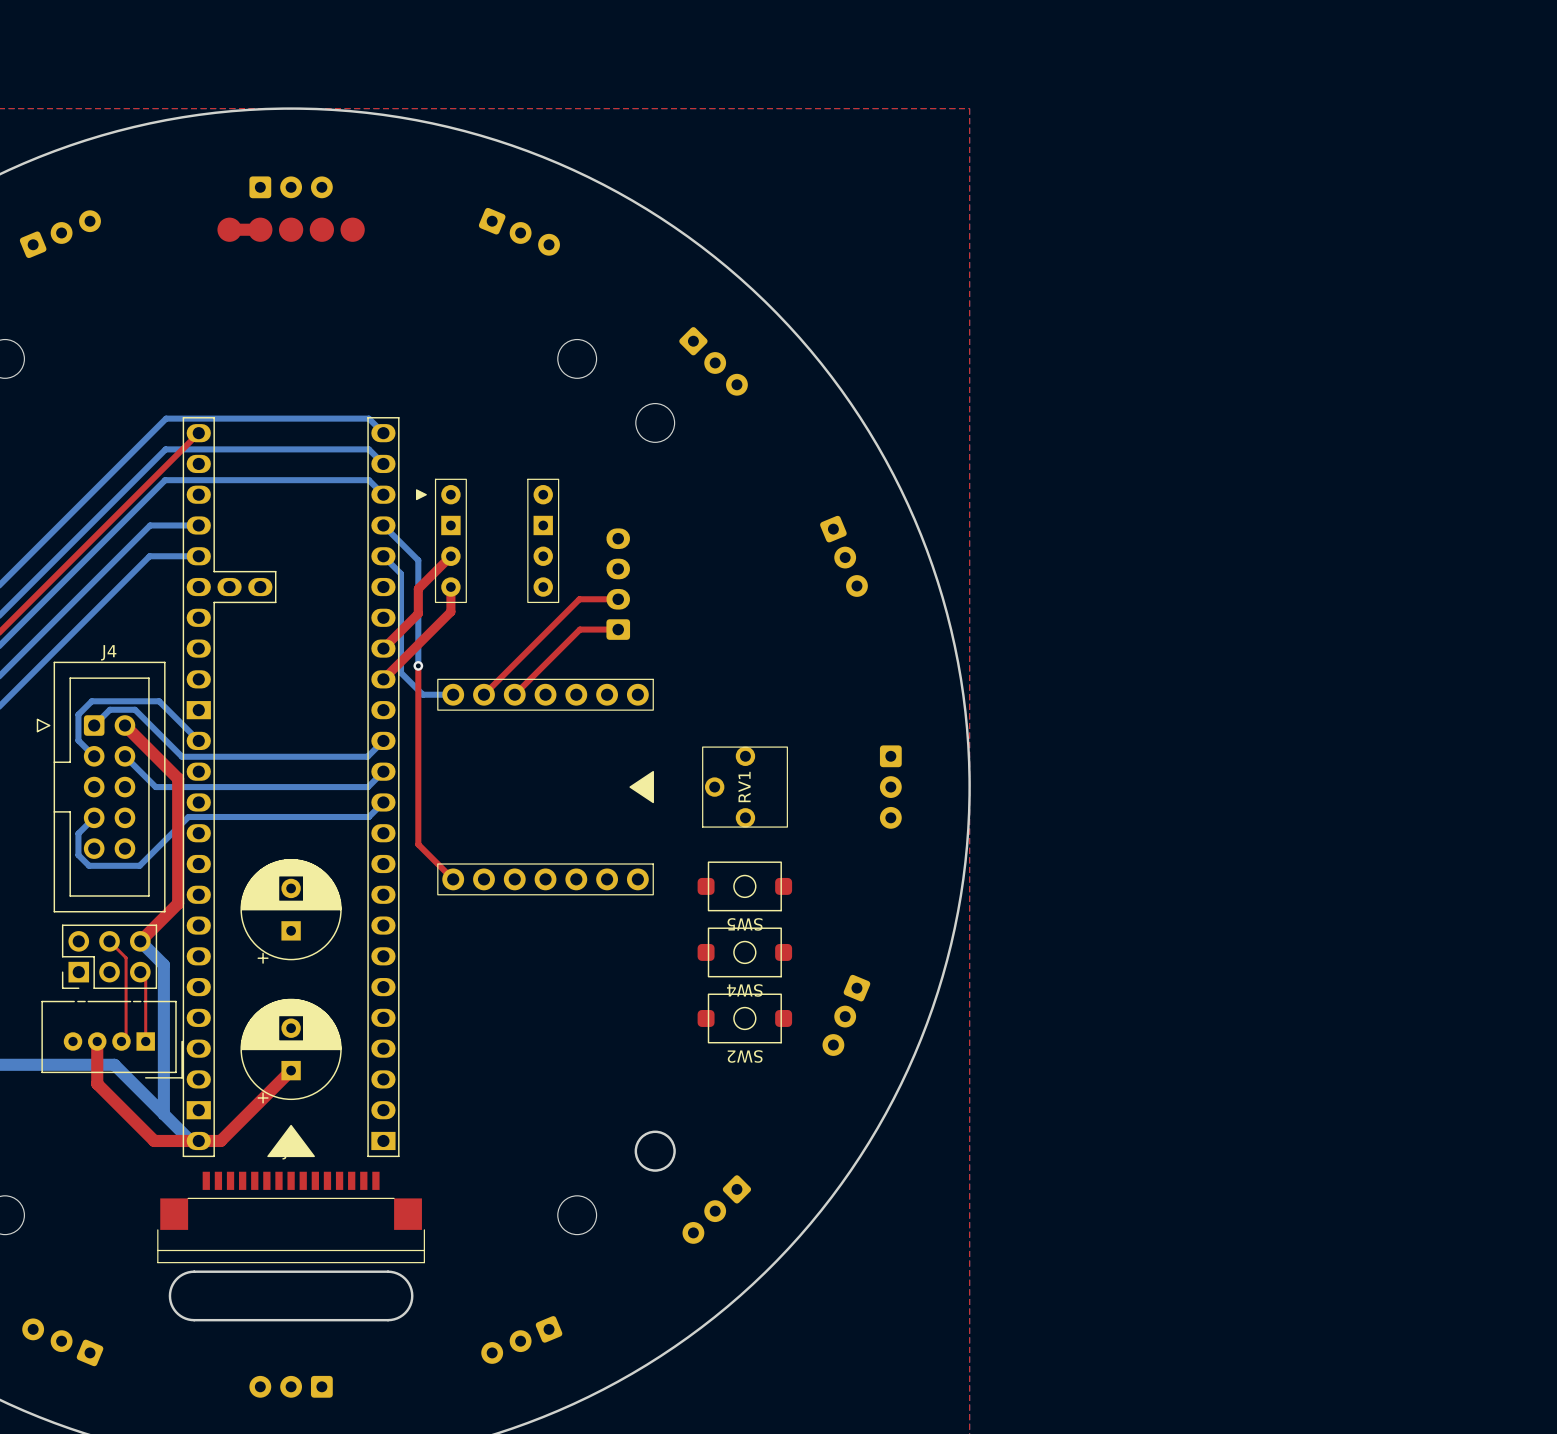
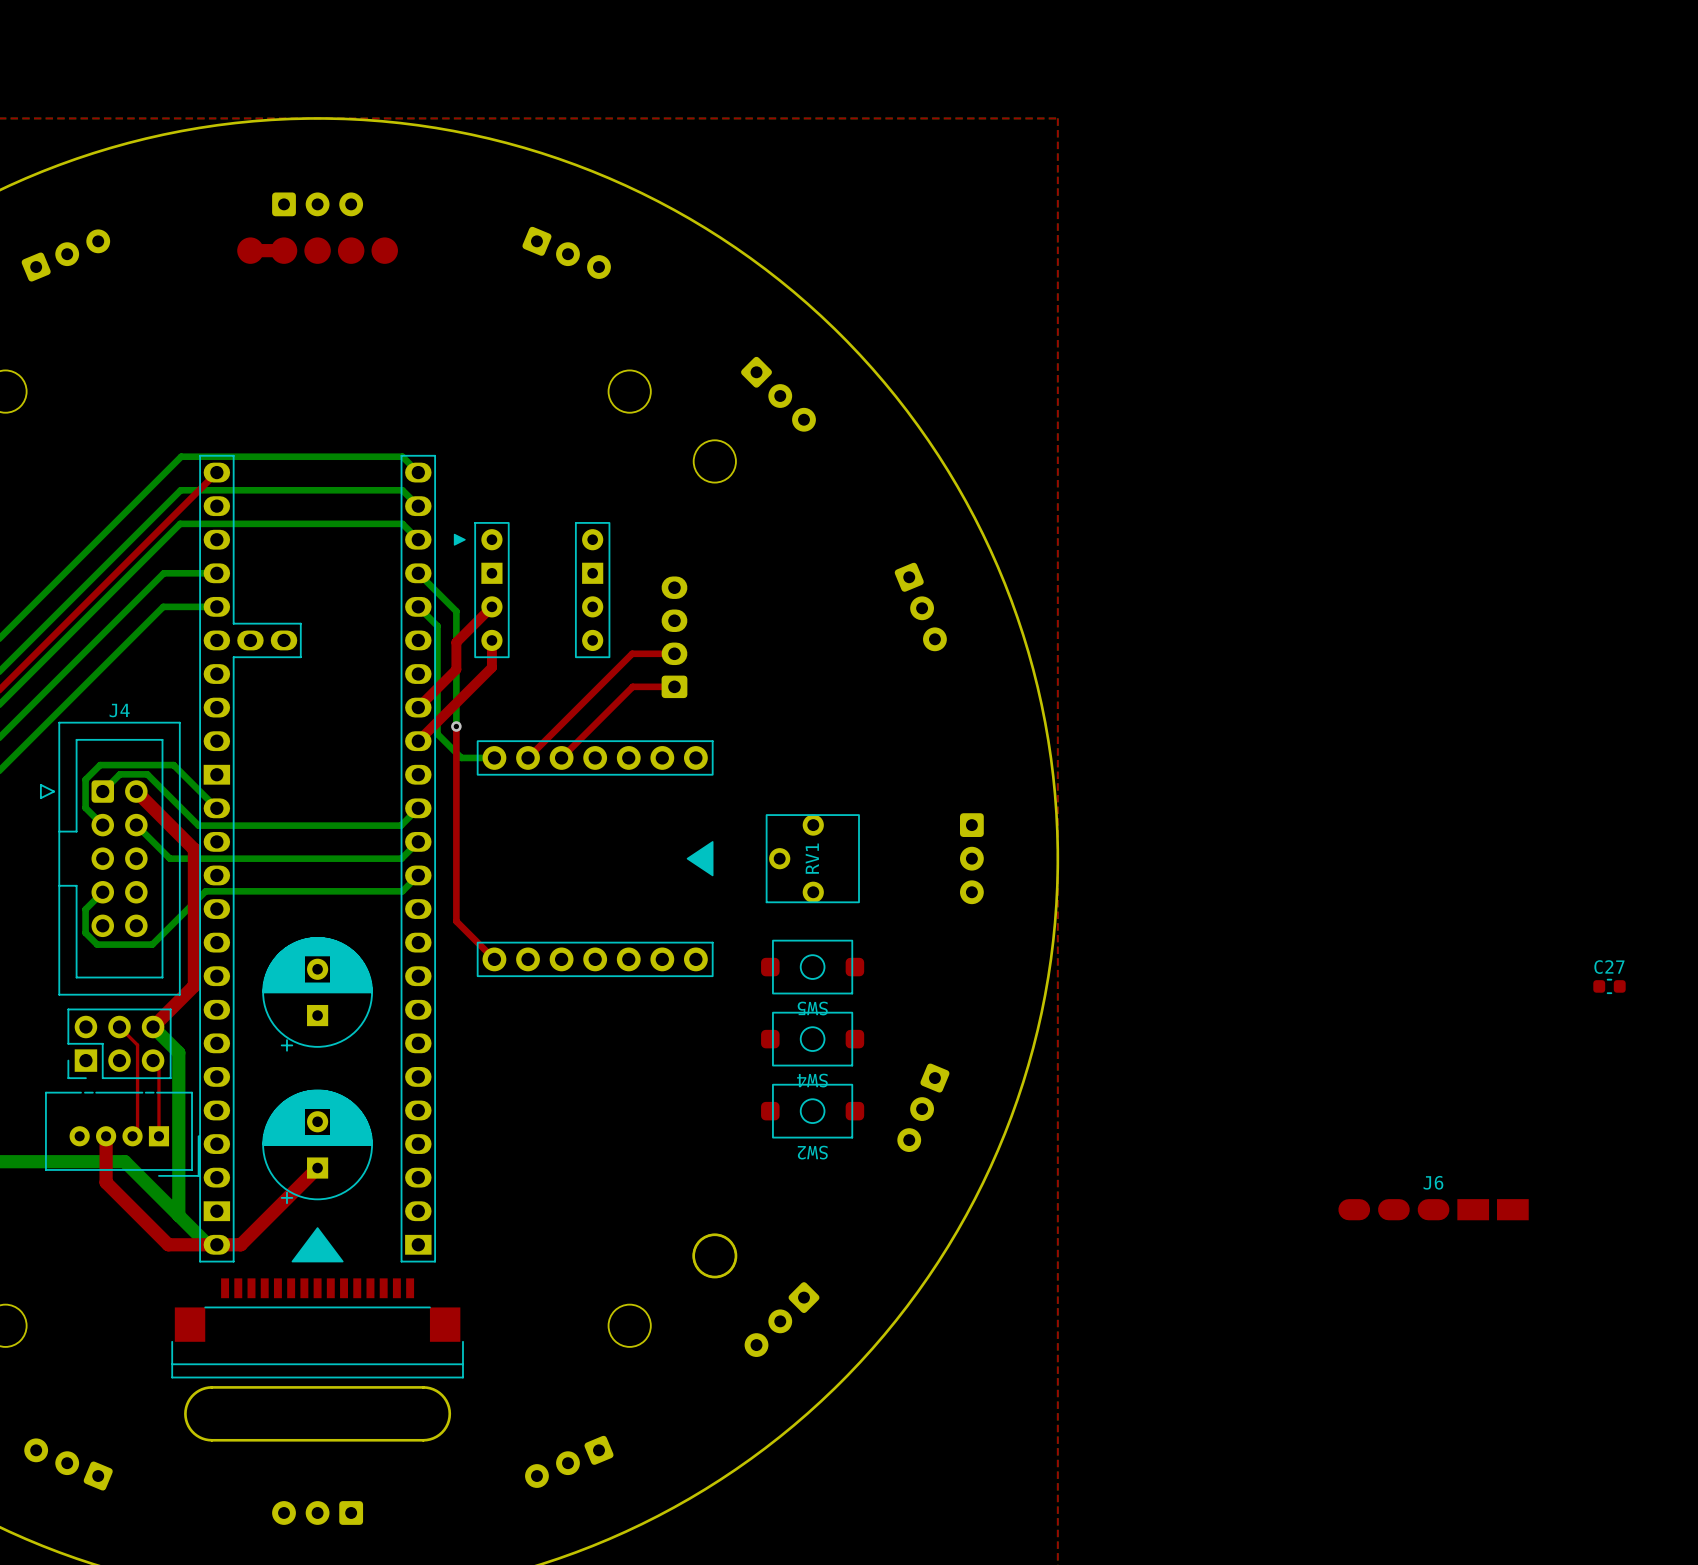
C27: none -> (1609, 986)
J6: none -> (1433, 1209)

